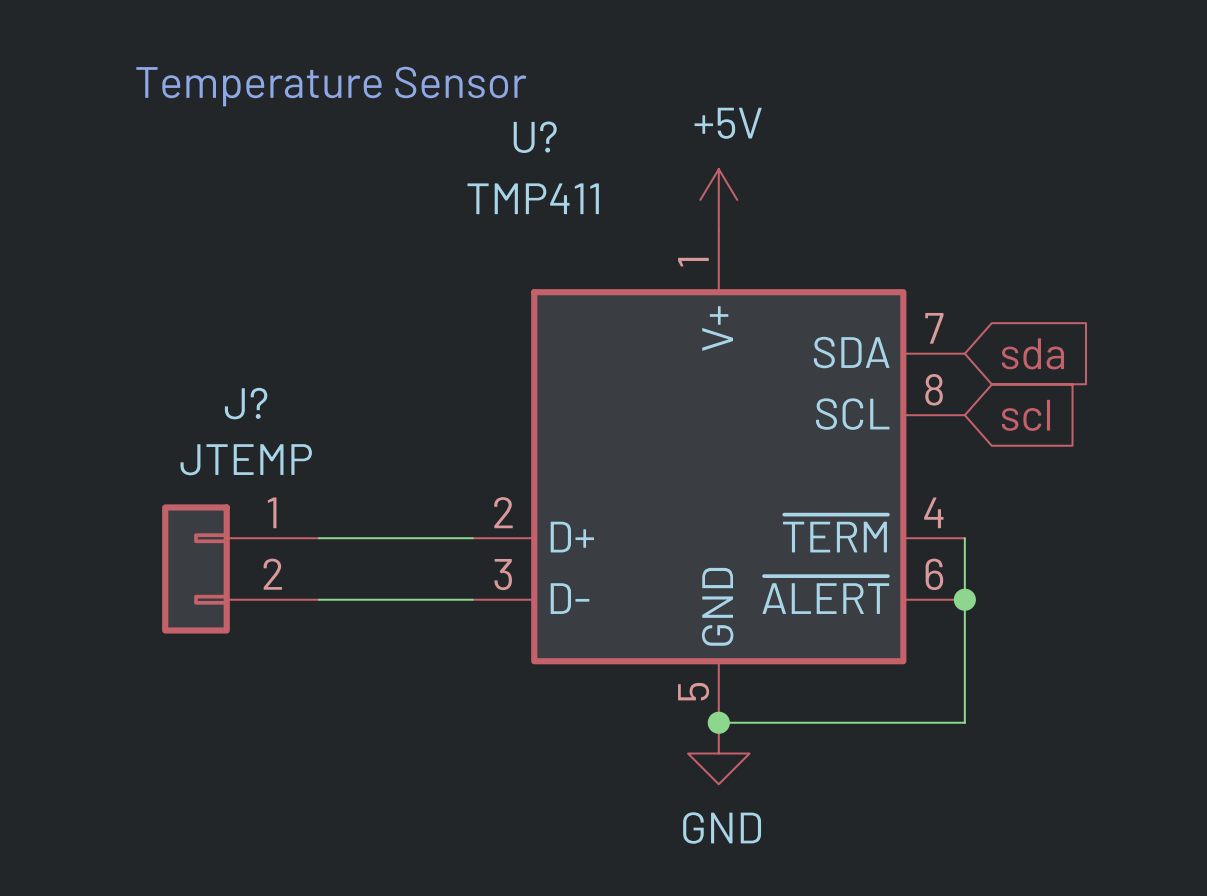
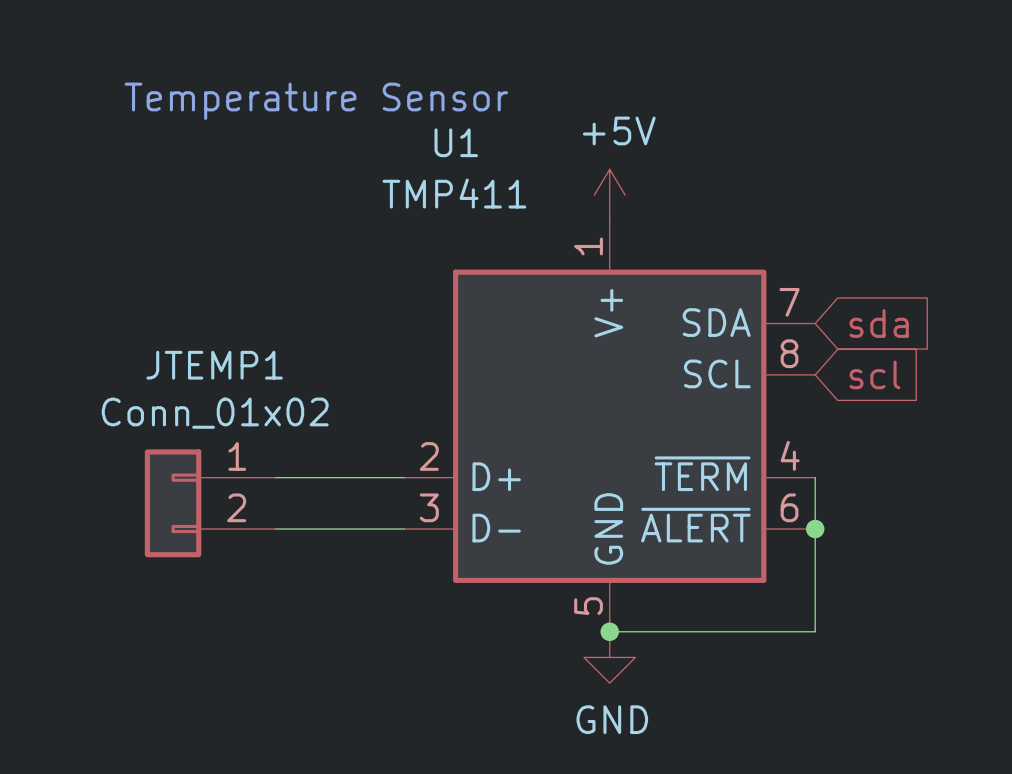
U? name: U? (535, 137) -> U1 (456, 142)
J? name: J? (246, 403) -> JTEMP1 (214, 365)
J? value: JTEMP (246, 459) -> Conn_01x02 (215, 413)

